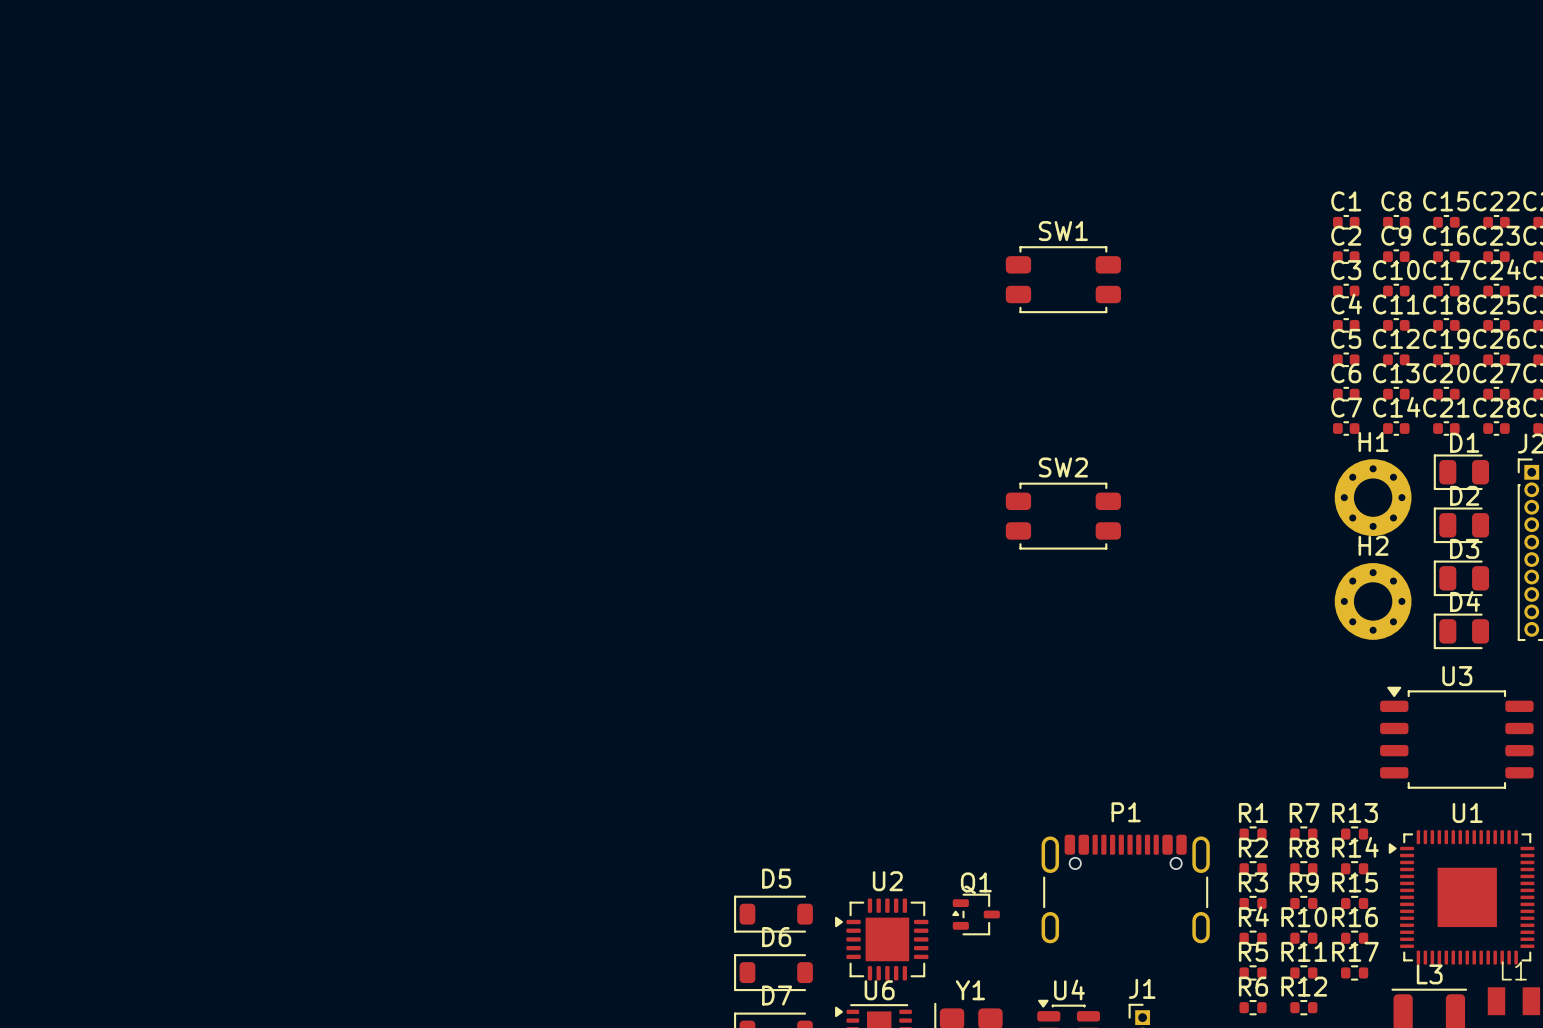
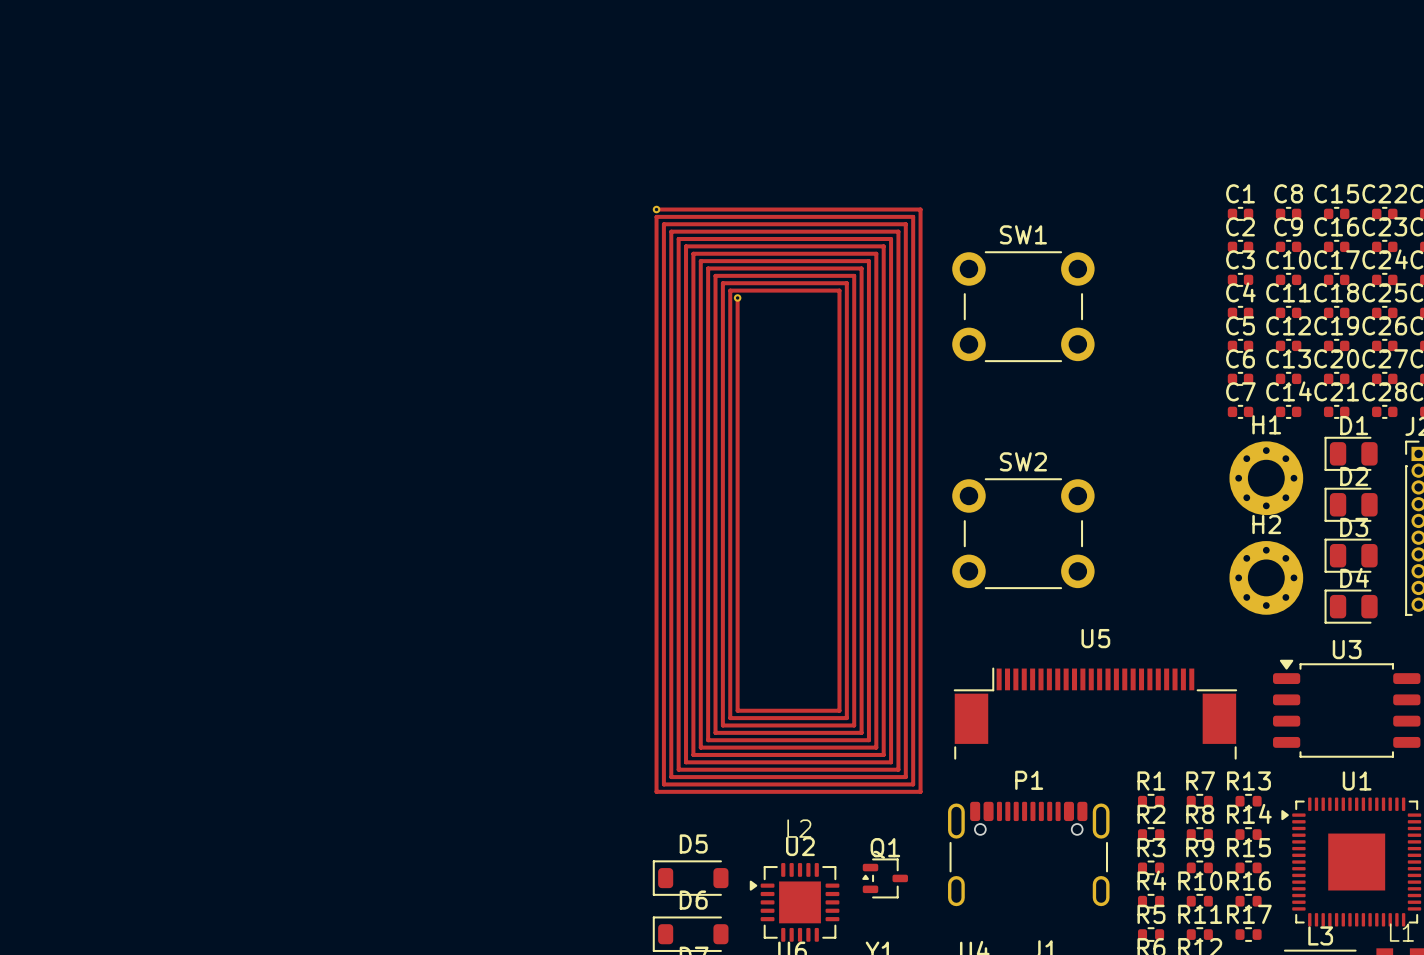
SW1 footprint: [1005, 246, 1121, 314] -> [952, 251, 1095, 363]
SW2 footprint: [1005, 482, 1121, 550] -> [952, 478, 1095, 590]
L2: none -> (787, 499)
U5: none -> (1095, 713)

